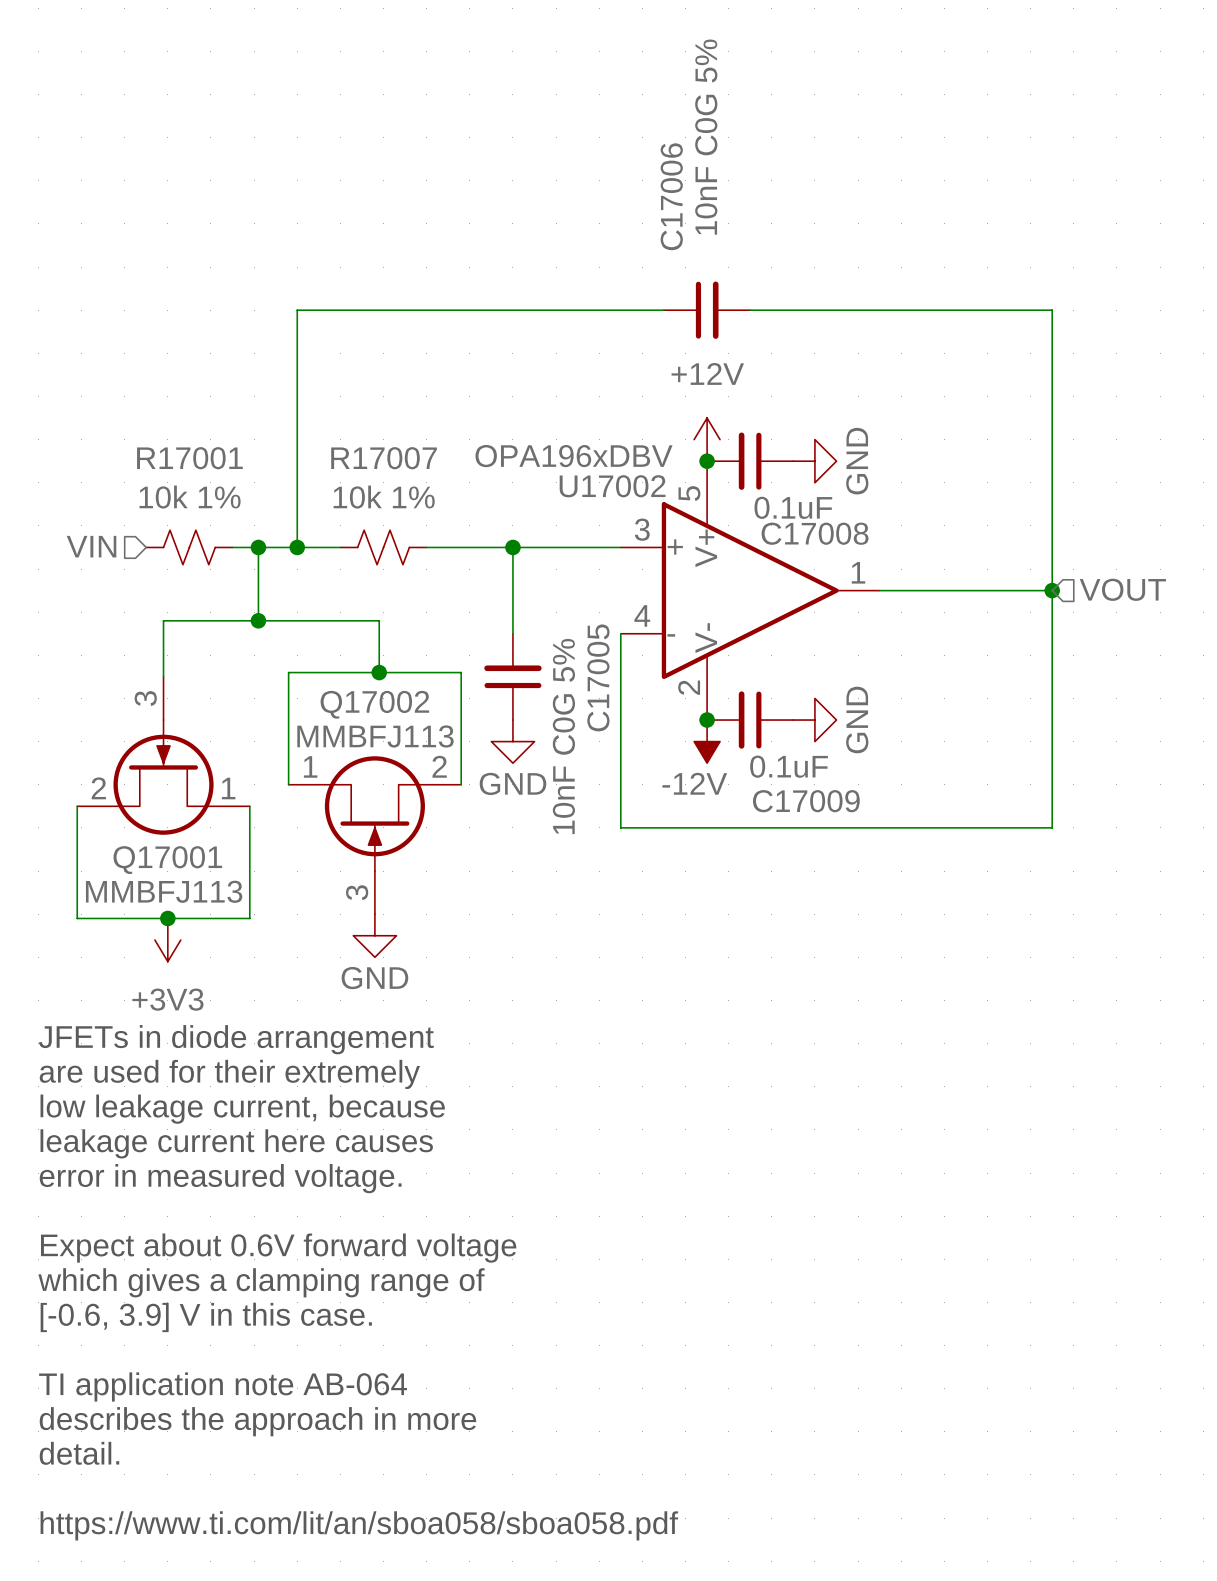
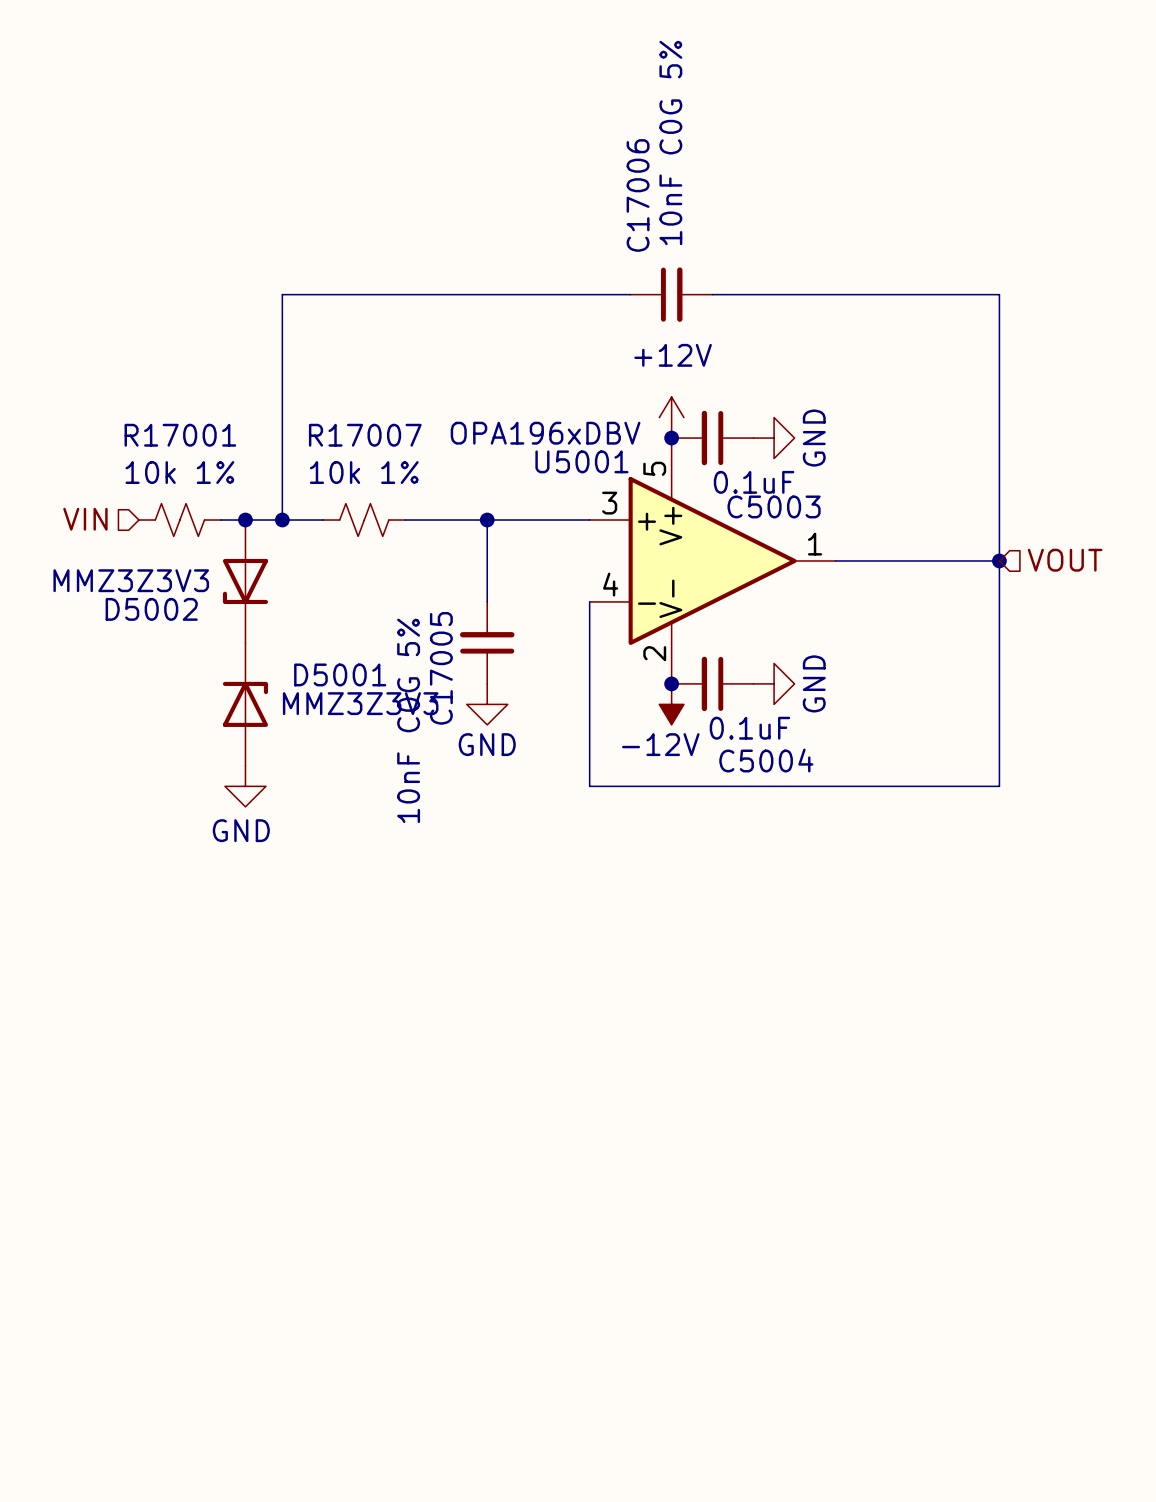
U17002 name: U17002 (612, 486) -> U5001 (581, 461)
C17008 name: C17008 (815, 533) -> C5003 (774, 506)
D5002: none -> MMZ3Z3V3 (245, 581)
junction: (258, 620) -> none
wire: (379, 672) (379, 620) (163, 620) (163, 676) -> none
junction: (379, 672) -> none
C17005 name position: C17005 (598, 677) -> C17005 (441, 668)
C17005 value position: 10nF C0G 5% (563, 736) -> 10nF C0G 5% (408, 720)
D5001: none -> MMZ3Z3V3 (245, 704)
Q17001: MMBFJ113 (163, 755) -> none
wire: (288, 784) (288, 672) (461, 672) (461, 784) -> none
C17009 name: C17009 (806, 801) -> C5004 (766, 760)
wire: (77, 806) (77, 918) (249, 918) (249, 806) -> none
Q17002: MMBFJ113 (374, 835) -> none
junction: (167, 918) -> none
power symbol position: GND (374, 935) -> GND (245, 786)
power symbol: +3V3 (167, 940) -> none
power symbol text position: GND (374, 978) -> GND (241, 830)
text: JFETs in diode arrangement (236, 1039) -> none
text: are used for their extremely (229, 1074) -> none
text: low leakage current, because (242, 1109) -> none
text: leakage current here causes (236, 1143) -> none
text: error in measured voltage. (220, 1178) -> none
text: Expect about 0.6V forward voltage (278, 1248) -> none
text: which gives a clamping range of (261, 1282) -> none
text: [-0.6, 3.9] V in this case. (206, 1317) -> none
text: TI application note AB-064 (223, 1386) -> none
text: describes the approach in more (257, 1421) -> none
text: detail. (79, 1453) -> none
text: https://www.ti.com/lit/an/sboa058/sboa058.pdf (359, 1525) -> none

